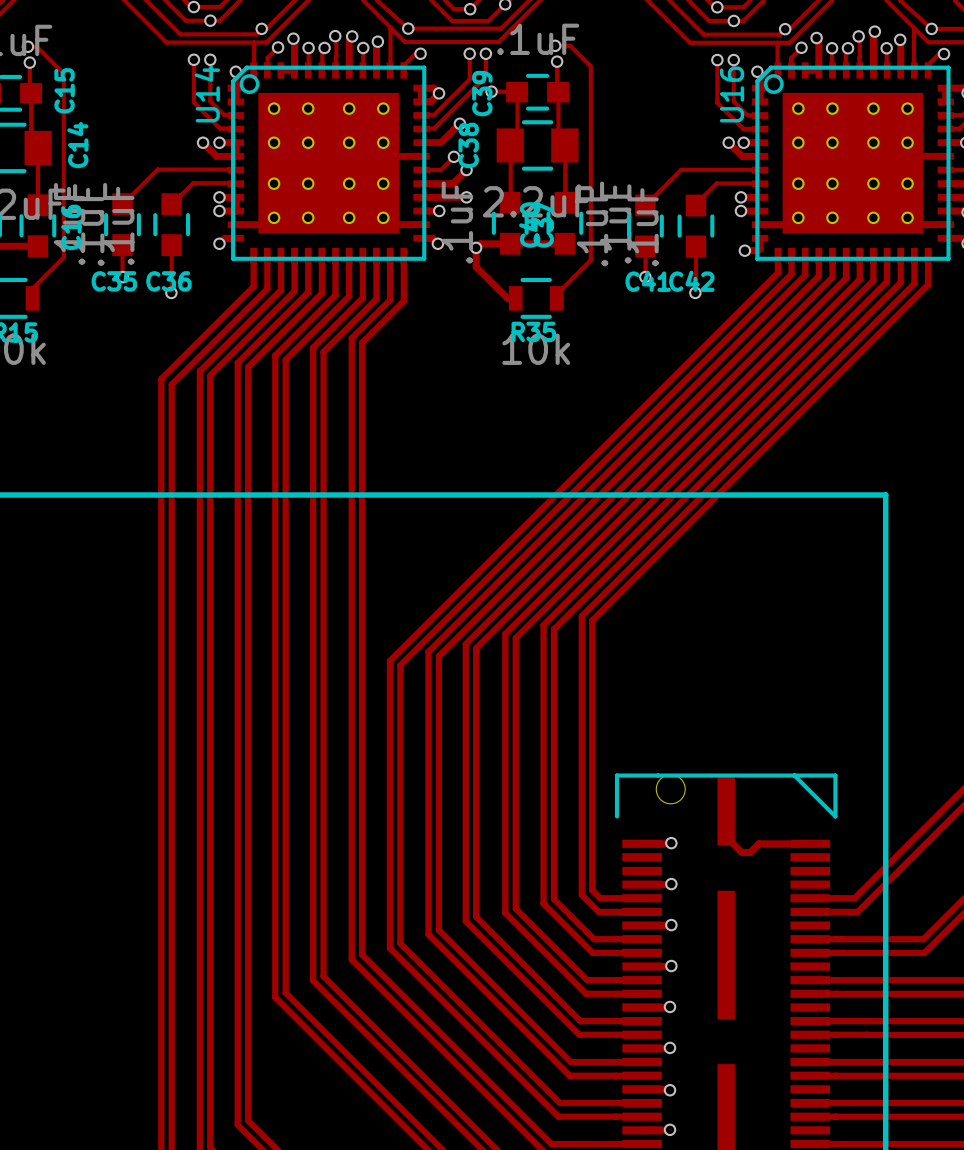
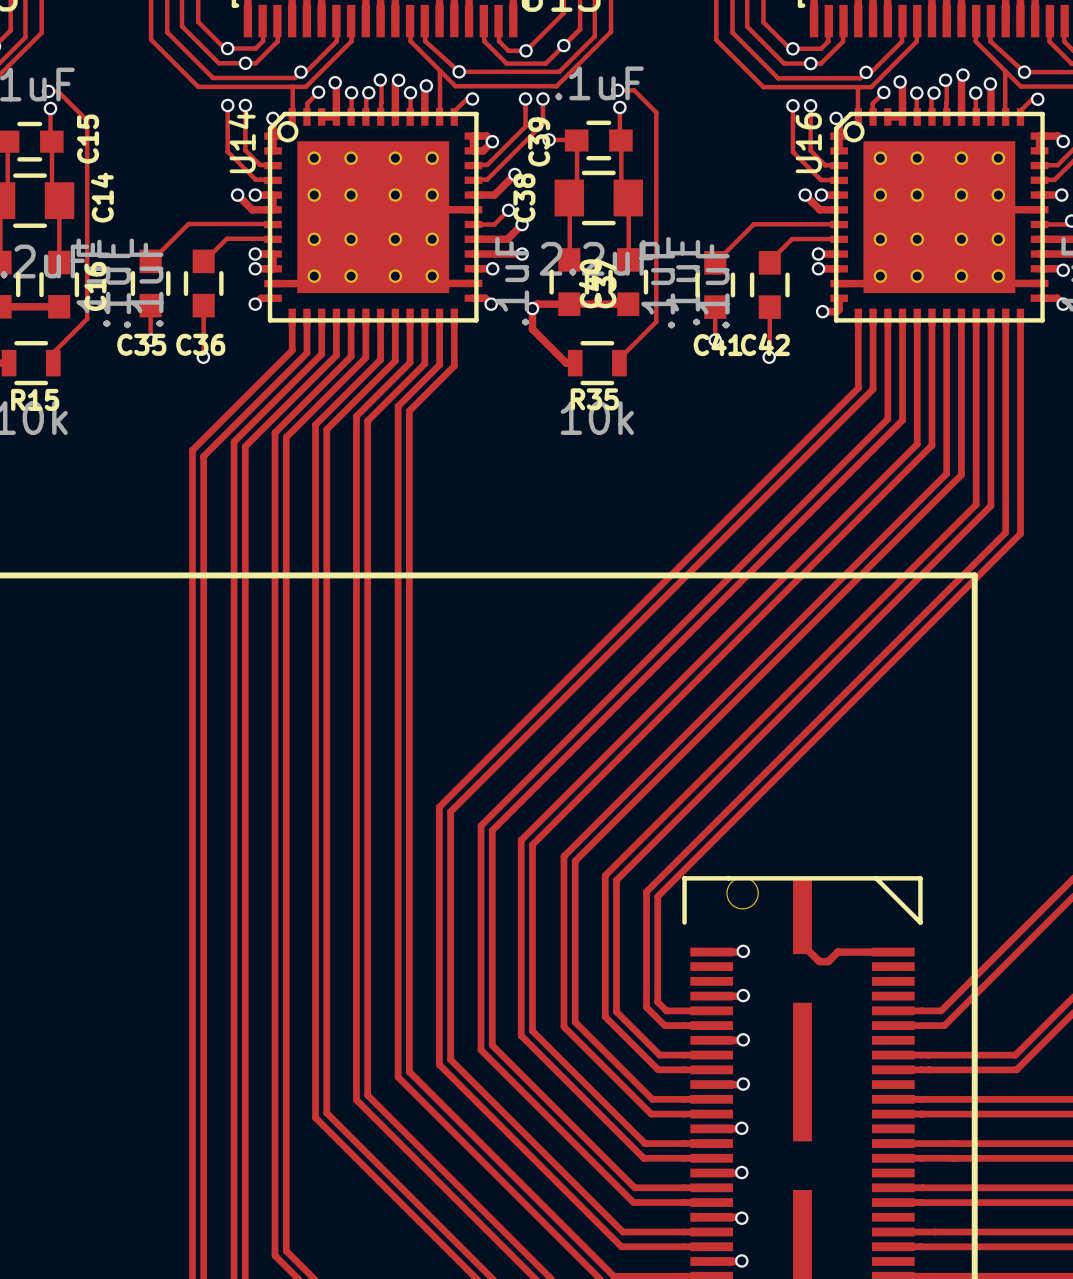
track: (777, 273) (389, 660) (389, 709) -> (858, 335) (858, 388) (439, 807)
track: (791, 274) (400, 665) (400, 713) -> (873, 336) (873, 389) (450, 811)
track: (805, 275) (428, 651) (428, 726) -> (887, 338) (887, 419) (481, 825)
track: (818, 276) (438, 656) (438, 731) -> (902, 339) (902, 420) (492, 830)
track: (832, 277) (465, 644) (465, 740) -> (917, 340) (917, 444) (521, 840)
track: (846, 278) (476, 648) (476, 744) -> (931, 341) (931, 445) (532, 844)
track: (859, 279) (505, 633) (505, 755) -> (946, 342) (946, 473) (563, 856)
track: (873, 280) (515, 638) (515, 759) -> (961, 343) (961, 474) (575, 861)
track: (887, 281) (543, 625) (543, 772) -> (976, 344) (976, 504) (605, 875)
track: (900, 282) (553, 629) (553, 777) -> (990, 346) (990, 505) (616, 880)
track: (914, 283) (581, 616) (581, 788) -> (1005, 347) (1005, 532) (646, 891)
track: (928, 284) (592, 620) (592, 792) -> (1020, 348) (1020, 533) (657, 896)

